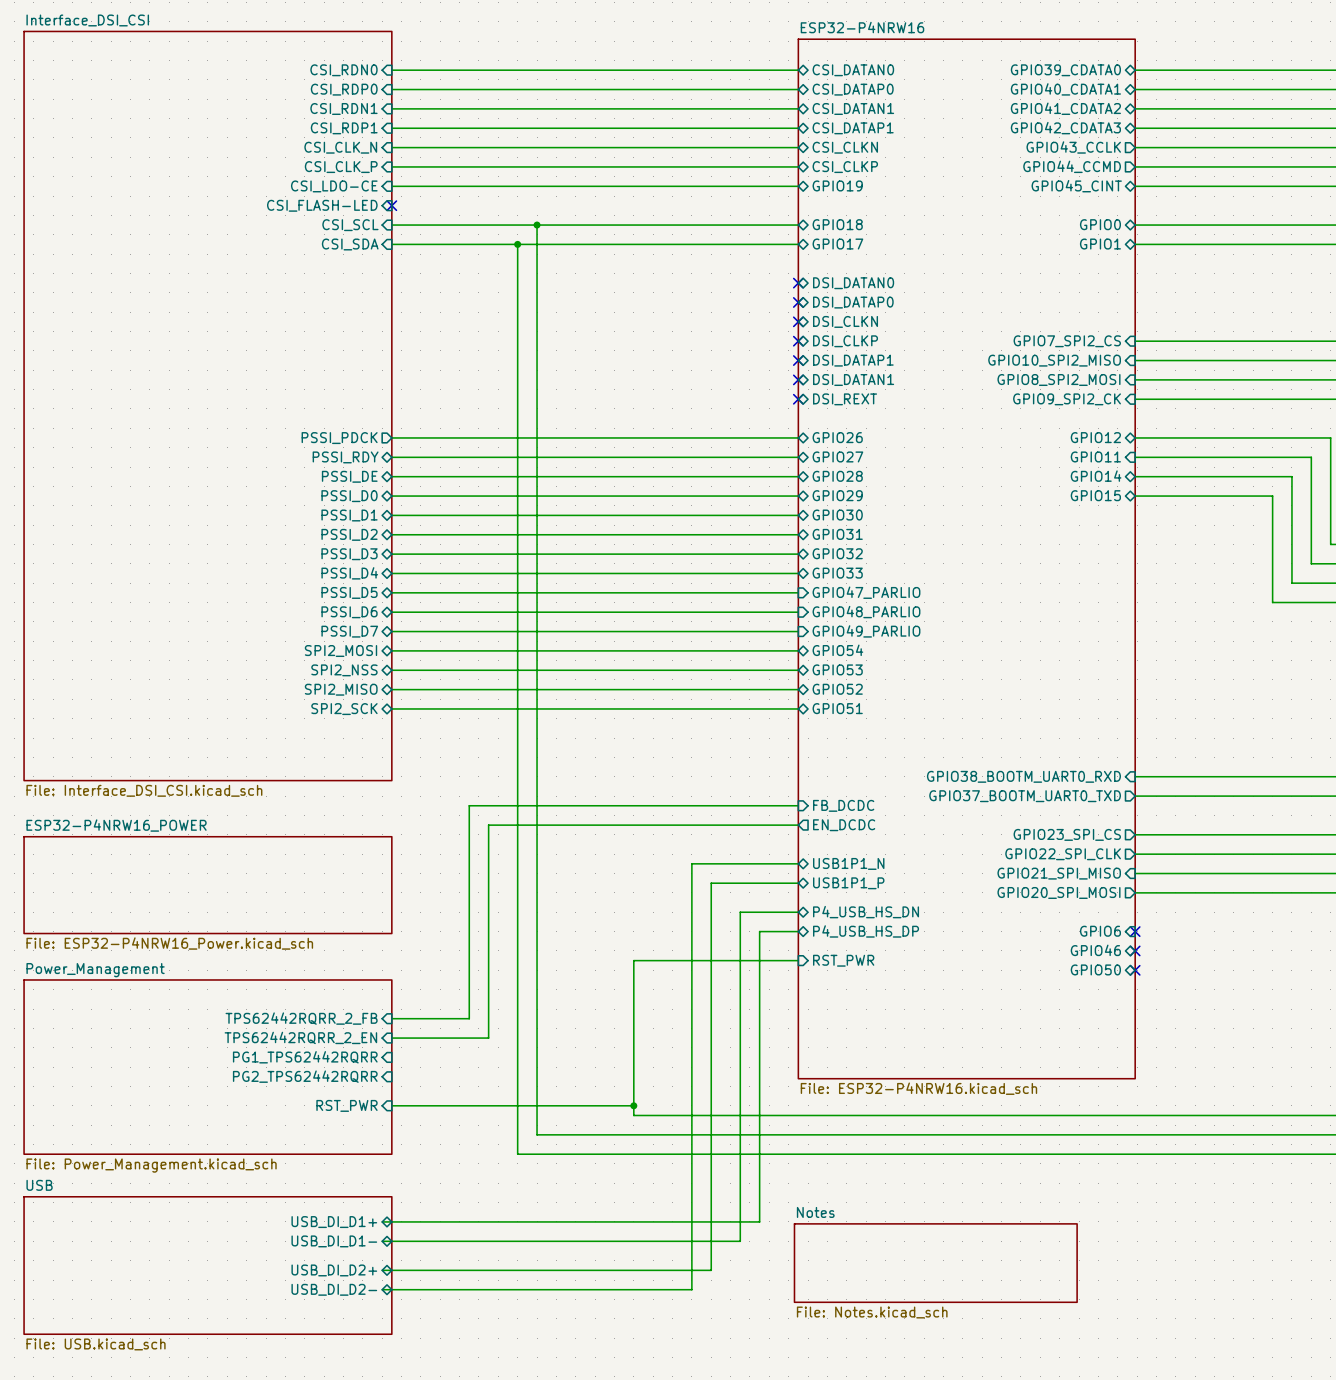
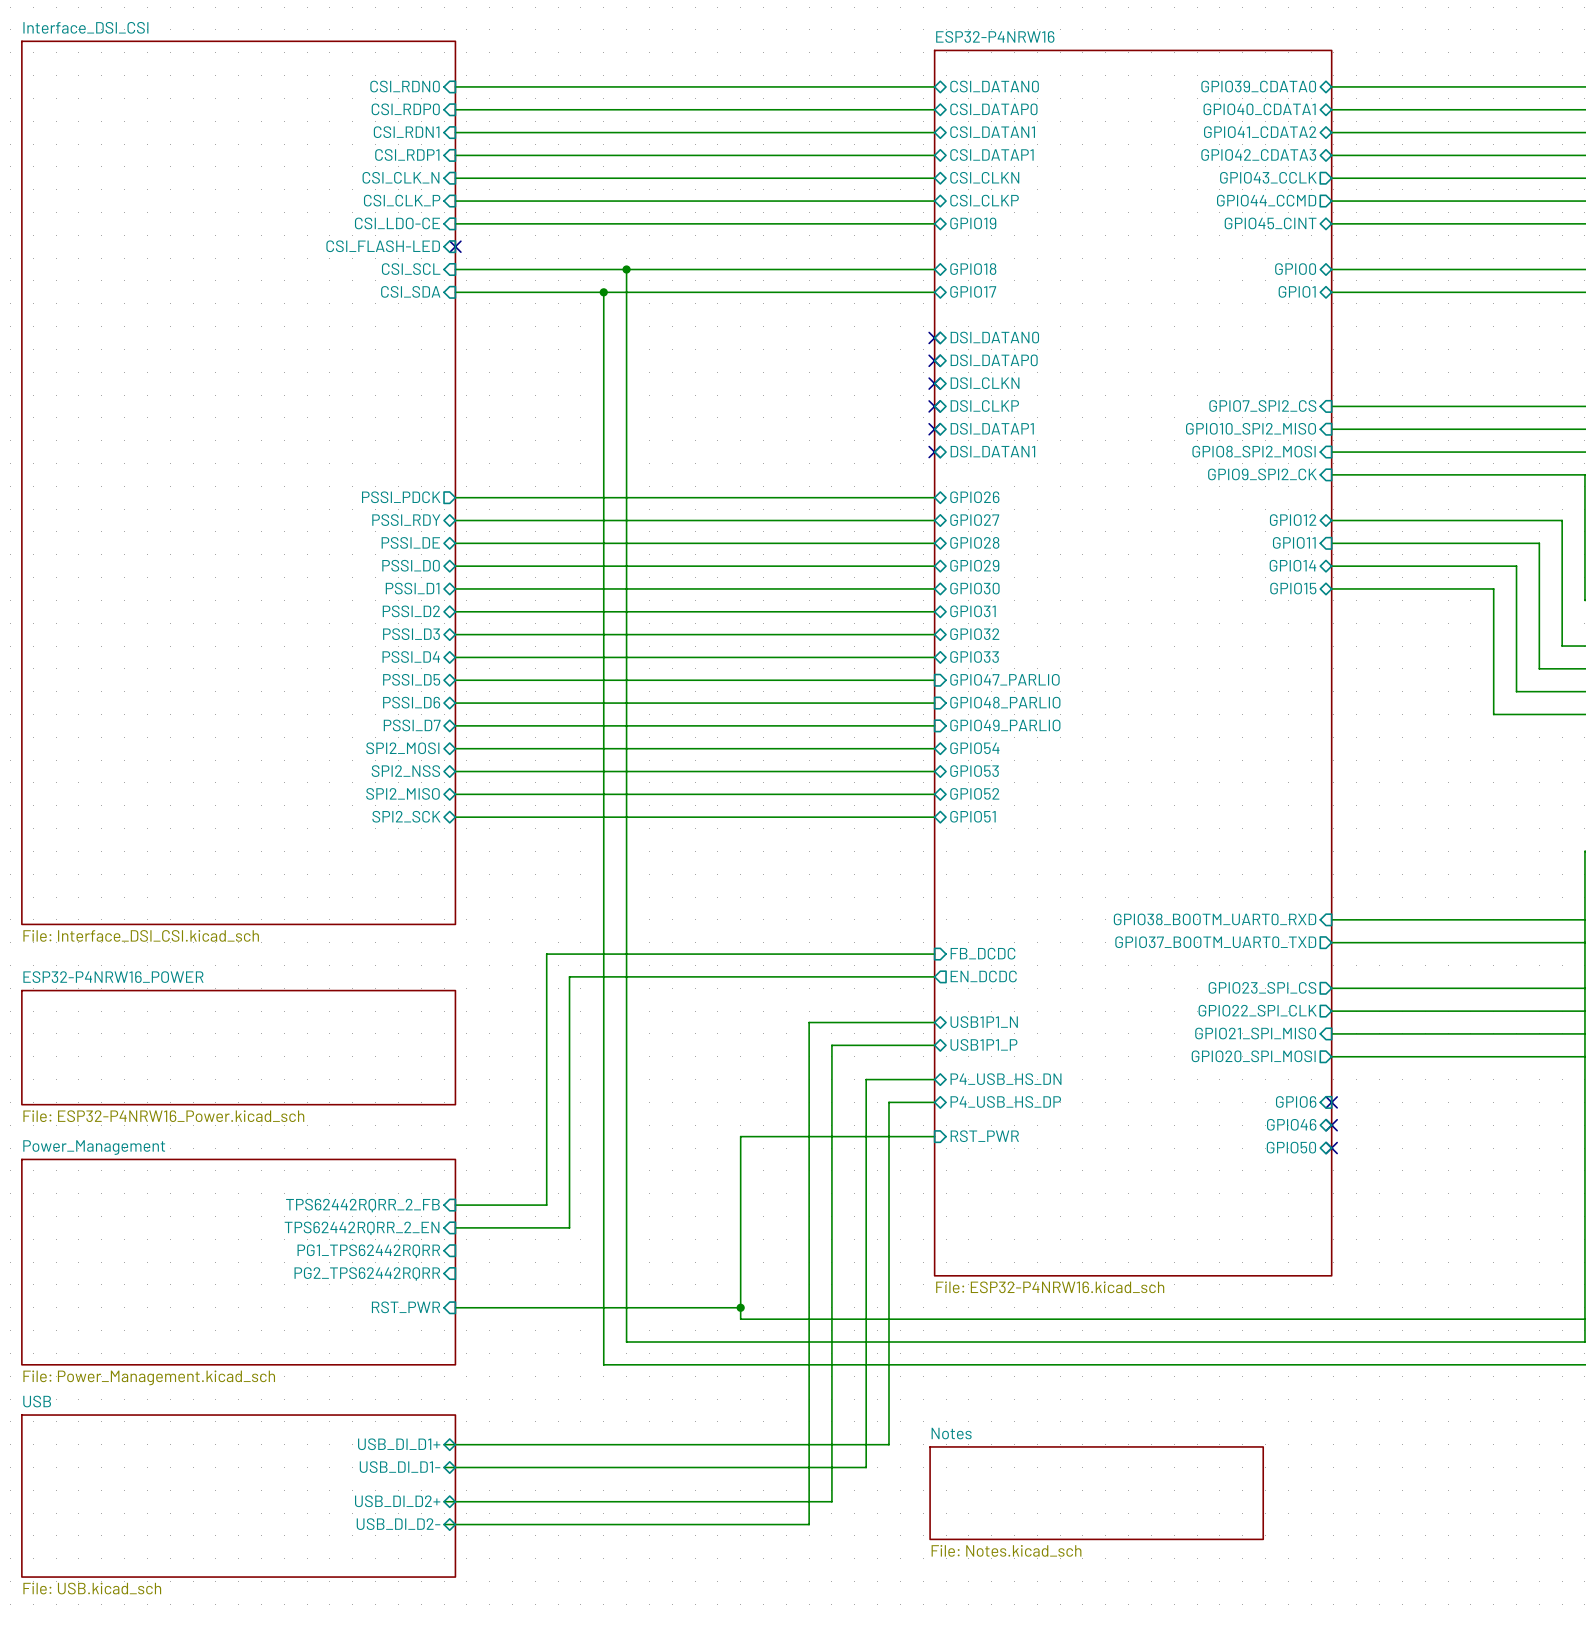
no-connect mark: (798, 399) -> none
sheet pin: DSI_REXT (845, 399) -> none
sheet pin: none -> PSSI_PDCK (401, 497)
wire: none -> (455, 497) (934, 497)
sheet pin: none -> GPIO26 (974, 497)
sheet pin: GPIO26 (837, 437) -> GPIO27 (974, 520)
sheet pin shape: output (339, 438) -> bidirectional (406, 520)
sheet pin: PSSI_PDCK (339, 438) -> PSSI_RDY (406, 520)
sheet pin: GPIO27 (837, 456) -> GPIO28 (974, 542)
sheet pin: PSSI_RDY (345, 457) -> PSSI_DE (410, 542)
sheet pin: PSSI_DE (349, 476) -> PSSI_D0 (411, 565)
sheet pin: GPIO28 (837, 476) -> GPIO29 (974, 565)
sheet pin: GPIO29 (837, 495) -> GPIO30 (974, 588)
sheet pin: PSSI_D0 (349, 496) -> PSSI_D1 (412, 588)
sheet pin: PSSI_D1 (349, 515) -> PSSI_D2 (411, 611)
sheet pin: GPIO30 (837, 515) -> GPIO31 (973, 611)
sheet pin: PSSI_D2 (349, 534) -> PSSI_D3 (411, 634)
sheet pin: GPIO31 (837, 534) -> GPIO32 (974, 634)
sheet pin: GPIO32 (837, 553) -> GPIO33 (974, 657)
sheet pin: PSSI_D3 (349, 554) -> PSSI_D4 (411, 657)
sheet pin: PSSI_D4 (349, 573) -> PSSI_D5 (411, 679)
sheet pin shape: bidirectional (837, 573) -> input (1004, 679)
sheet pin: GPIO33 (837, 573) -> GPIO47_PARLIO (1004, 679)
sheet pin: PSSI_D5 (349, 592) -> PSSI_D6 (411, 702)
sheet pin: GPIO47_PARLIO (866, 592) -> GPIO48_PARLIO (1005, 702)
sheet pin: PSSI_D6 (349, 612) -> PSSI_D7 (412, 725)
sheet pin: GPIO48_PARLIO (866, 612) -> GPIO49_PARLIO (1005, 725)
sheet pin: PSSI_D7 (349, 631) -> SPI2_MOSI (402, 748)
sheet pin shape: input (866, 631) -> bidirectional (974, 748)
sheet pin: GPIO49_PARLIO (866, 631) -> GPIO54 (974, 748)
sheet pin: GPIO54 (837, 650) -> GPIO53 (974, 771)
sheet pin: SPI2_MOSI (340, 651) -> SPI2_NSS (405, 771)
sheet pin: GPIO53 (837, 669) -> GPIO52 (974, 793)
sheet pin: SPI2_NSS (344, 670) -> SPI2_MISO (403, 793)
sheet pin: SPI2_MISO (341, 689) -> SPI2_SCK (406, 816)
sheet pin: GPIO52 (837, 689) -> GPIO51 (972, 816)
wire: (391, 708) (798, 708) -> none
sheet pin: GPIO51 (837, 708) -> none
sheet pin: SPI2_SCK (344, 709) -> none

